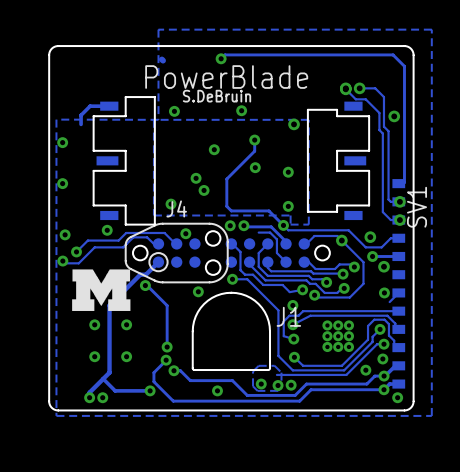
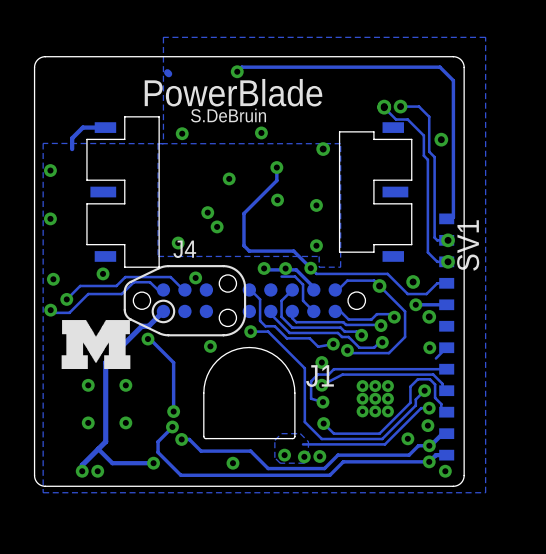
via position: (230, 225) -> (285, 268)

